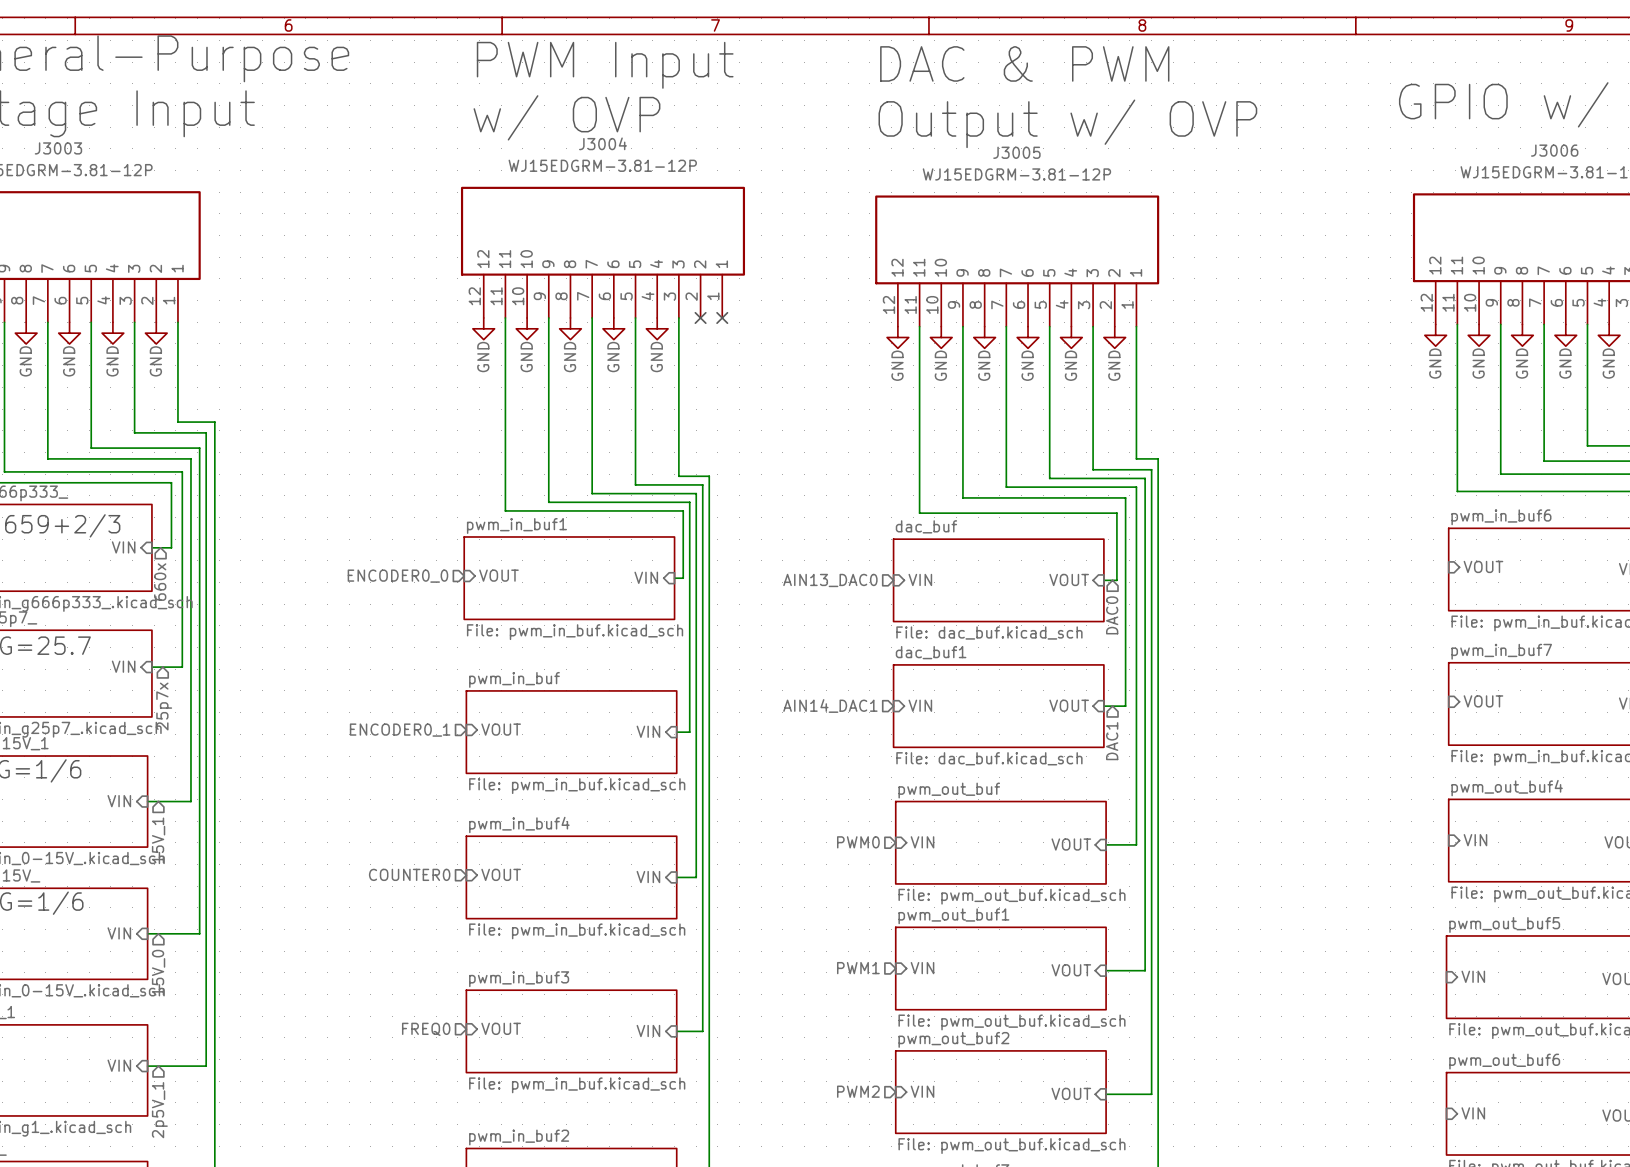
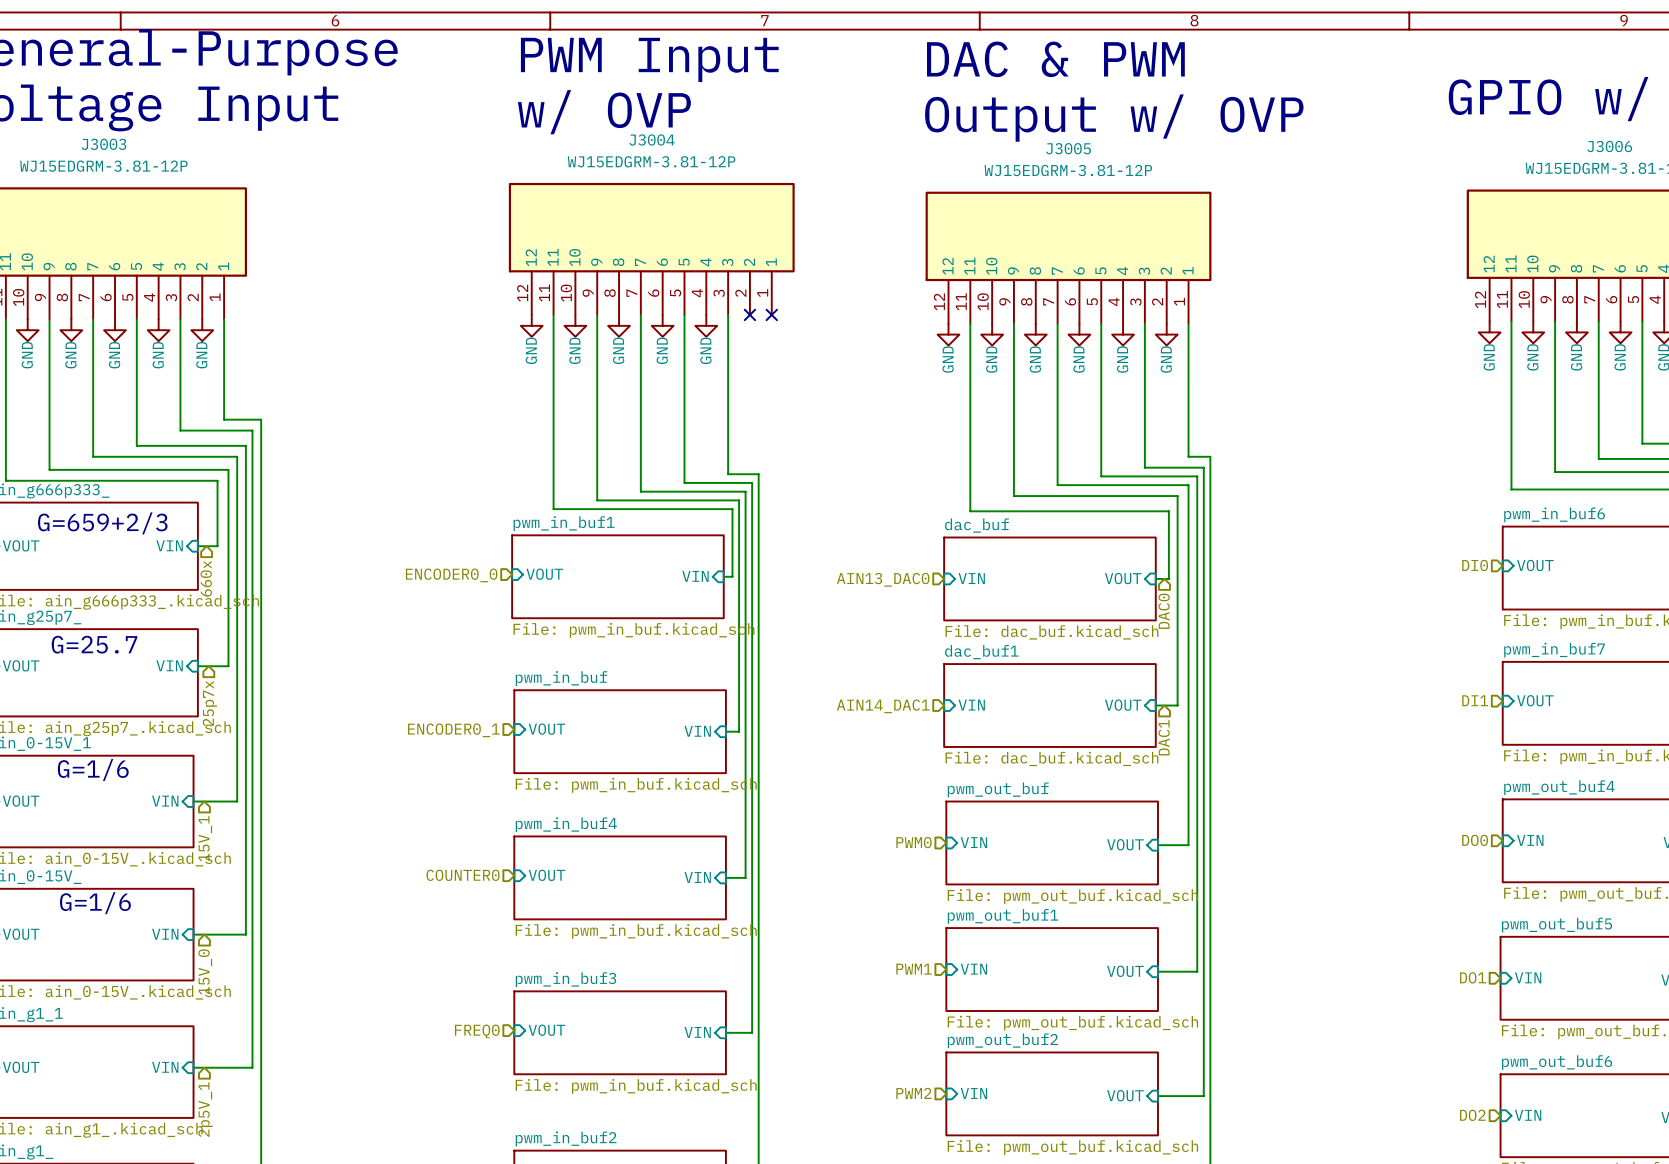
hierarchical label: none -> DI0 (1475, 565)
hierarchical label: none -> DI1 (1475, 700)
hierarchical label: none -> DO0 (1475, 840)
hierarchical label: none -> DO1 (1473, 977)
hierarchical label: none -> DO2 (1472, 1115)

